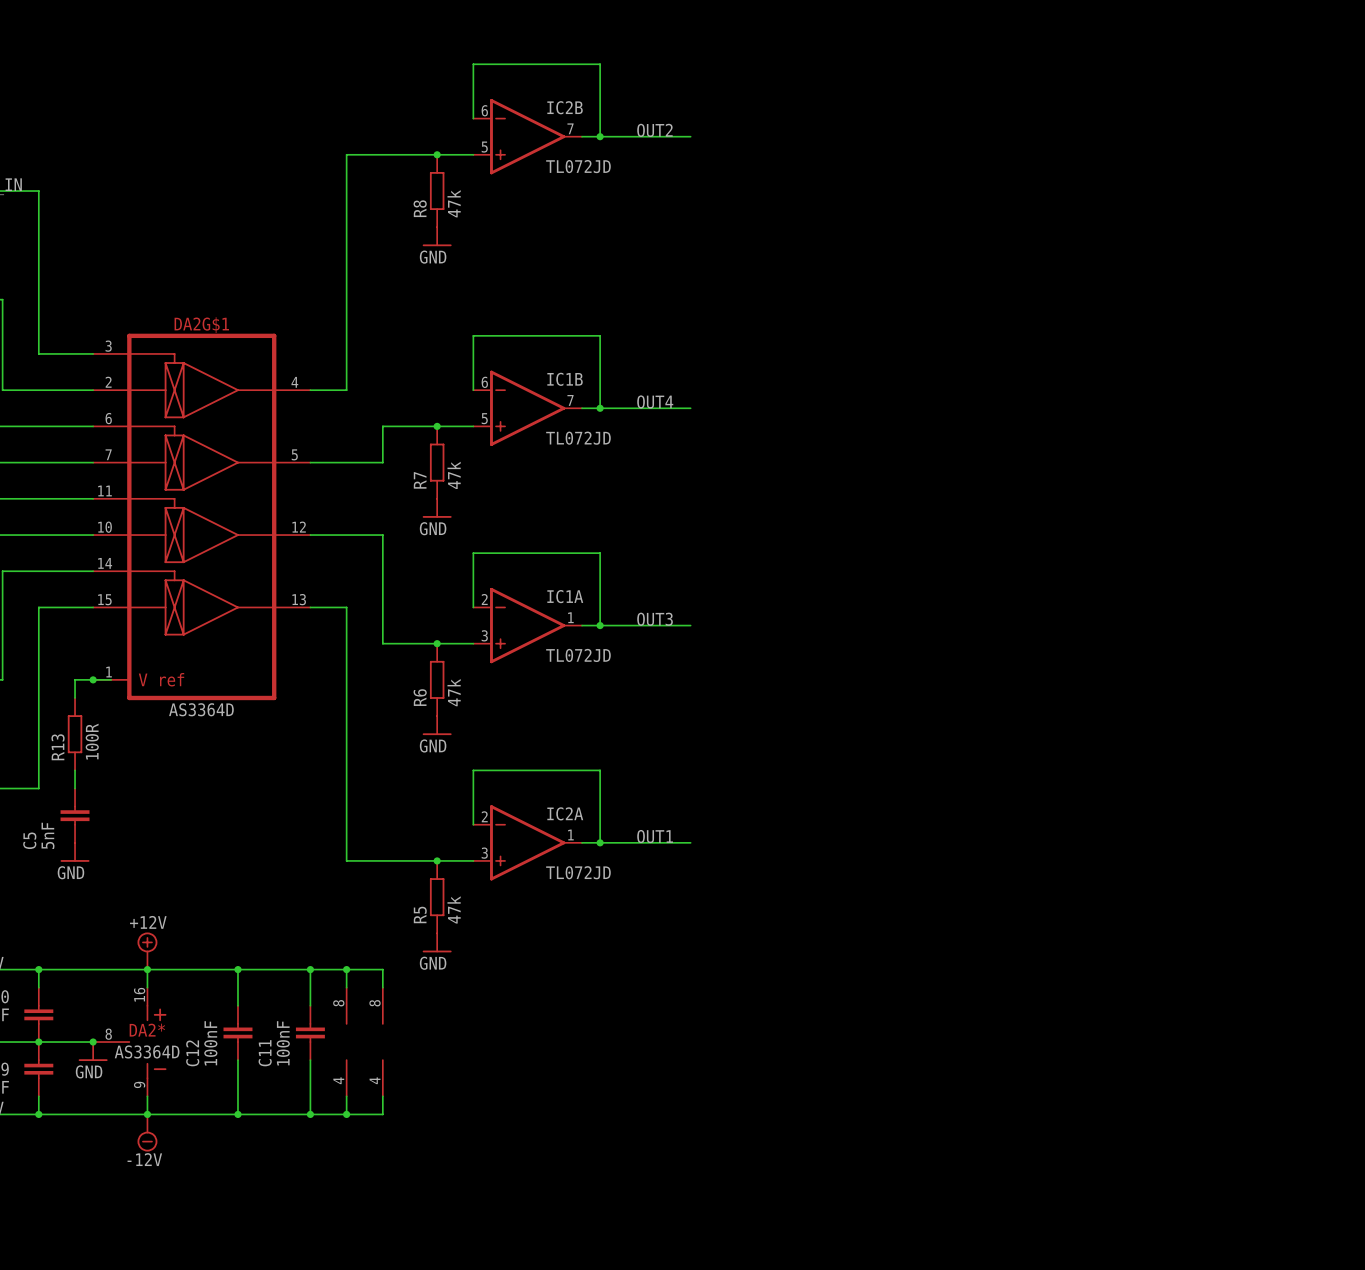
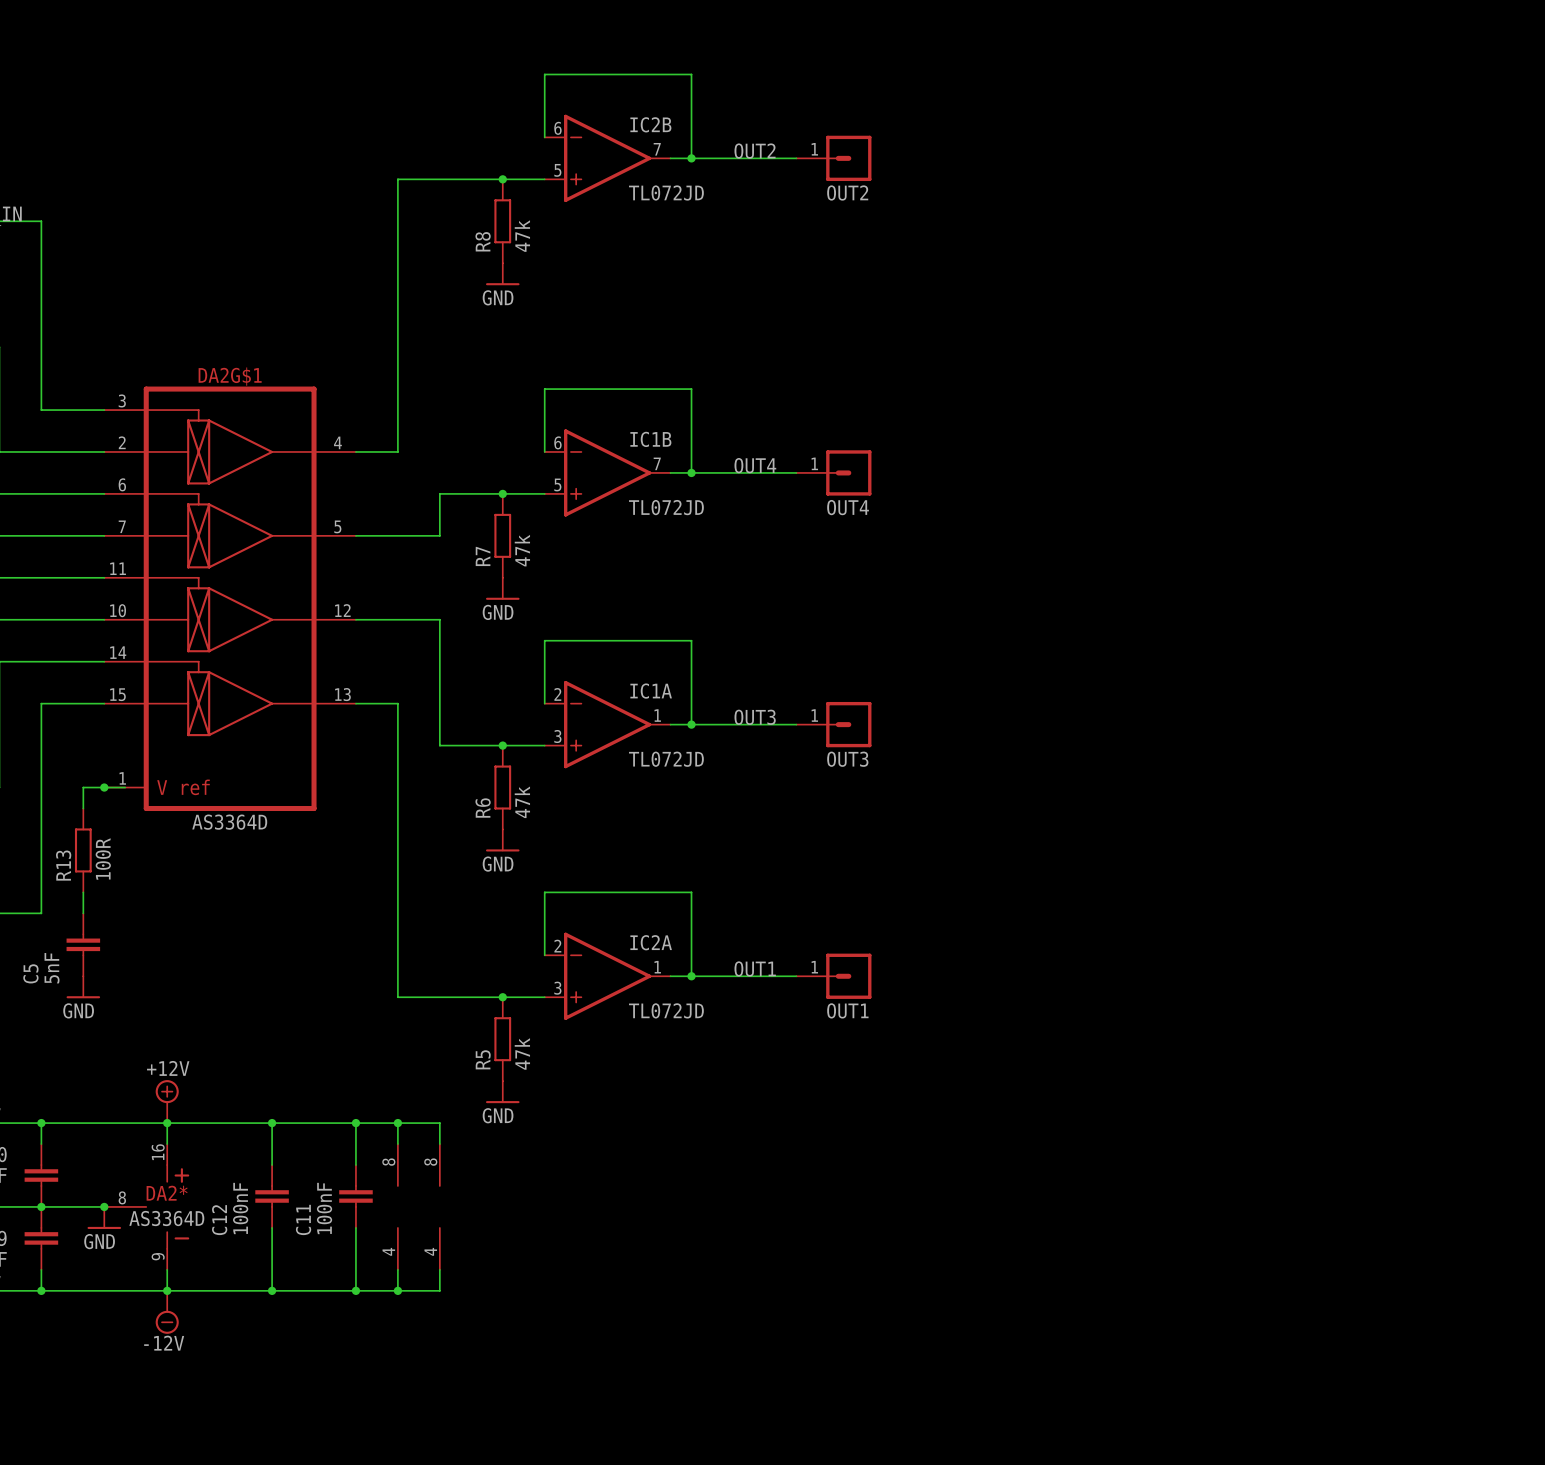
OUT2: none -> (833, 158)
OUT4: none -> (833, 472)
OUT3: none -> (833, 724)
OUT1: none -> (833, 976)

